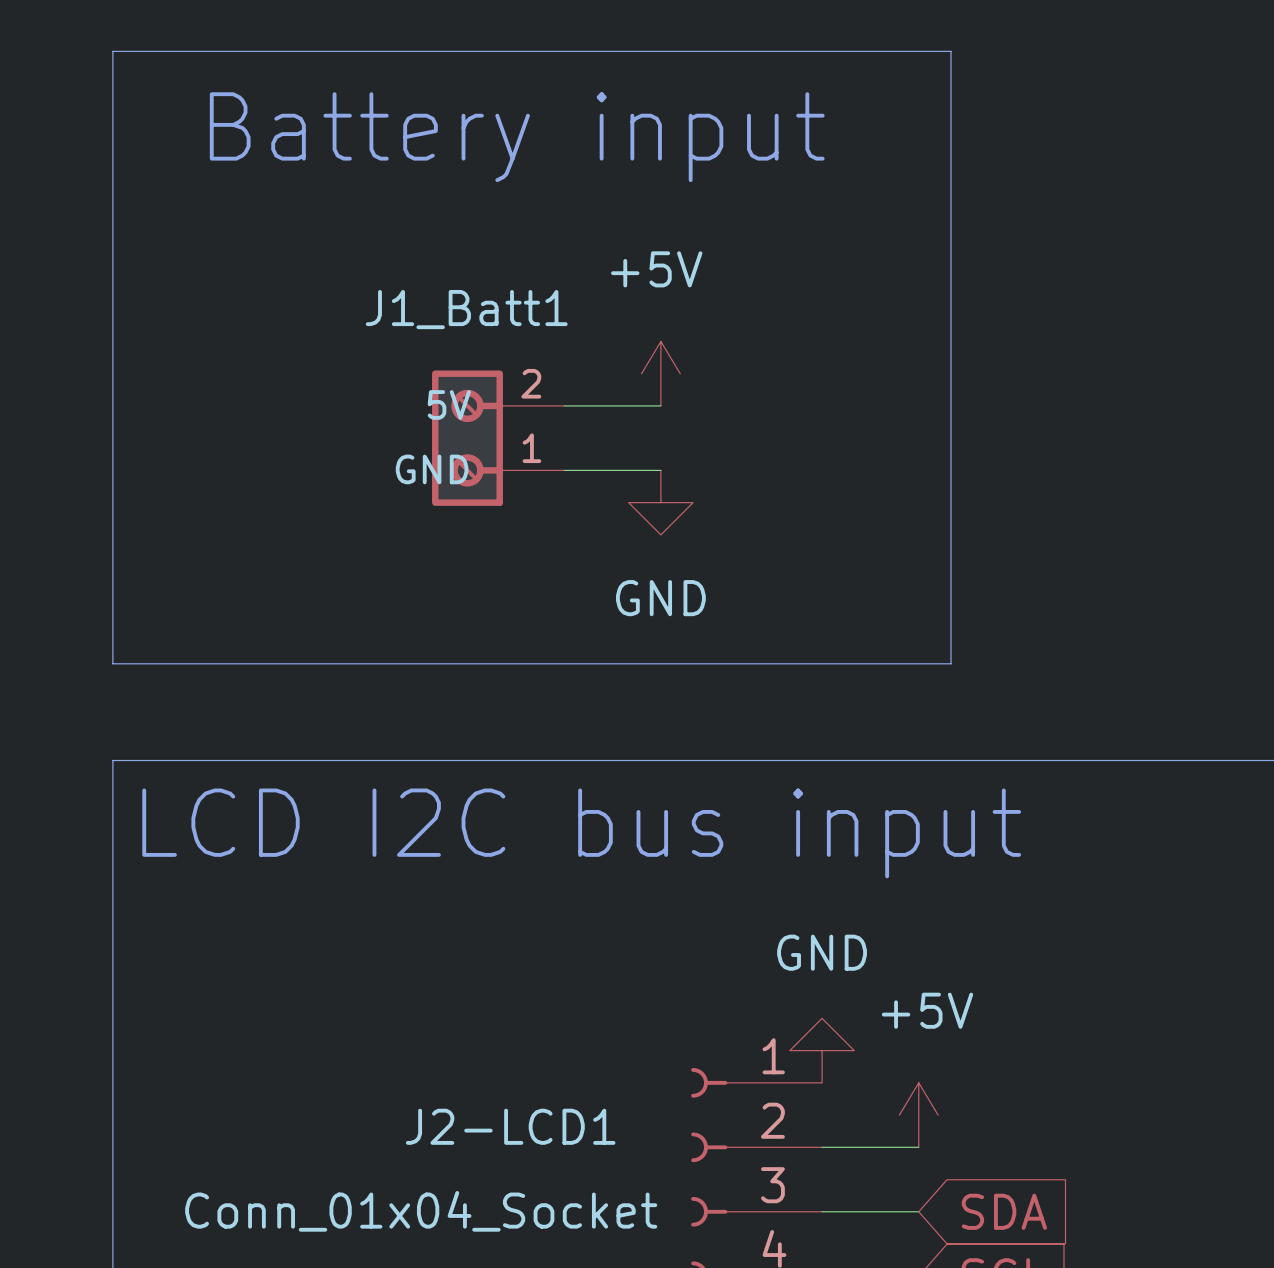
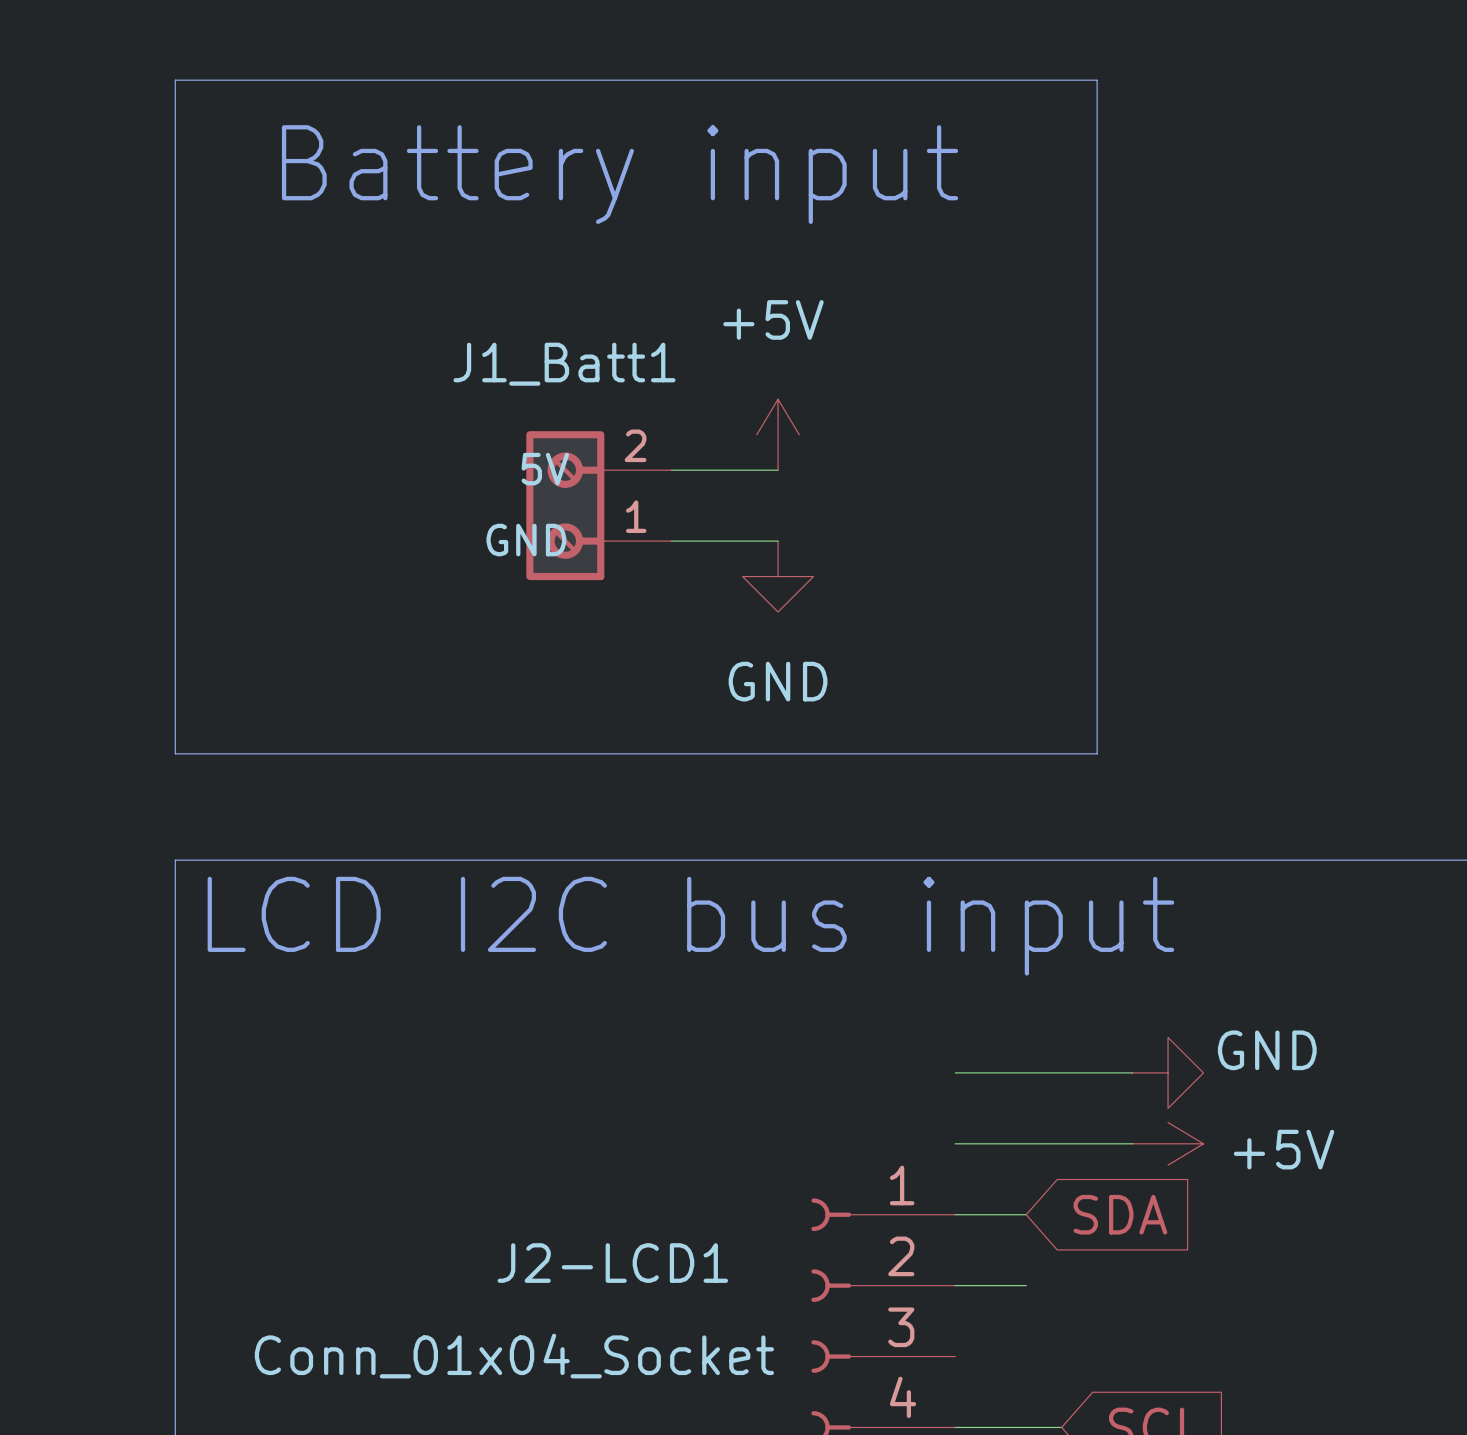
text position: LCD I2C bus input (581, 833) -> LCD I2C bus input (690, 926)
wire: none -> (955, 1072) (1132, 1072)
wire: none -> (955, 1143) (1132, 1143)
power symbol rotation: 0° (822, 1050) -> 90° clockwise (1168, 1072)
power symbol position: GND (822, 1050) -> GND (1168, 1072)
wire: none -> (955, 1214) (1026, 1214)
power symbol rotation: 0° (918, 1115) -> 90° clockwise (1168, 1143)
power symbol position: +5V (918, 1115) -> +5V (1168, 1143)
wire: (886, 1147) (918, 1147) -> none
wire: (822, 1211) (918, 1211) -> none
global label position: SDA (1004, 1211) -> SDA (1120, 1214)

